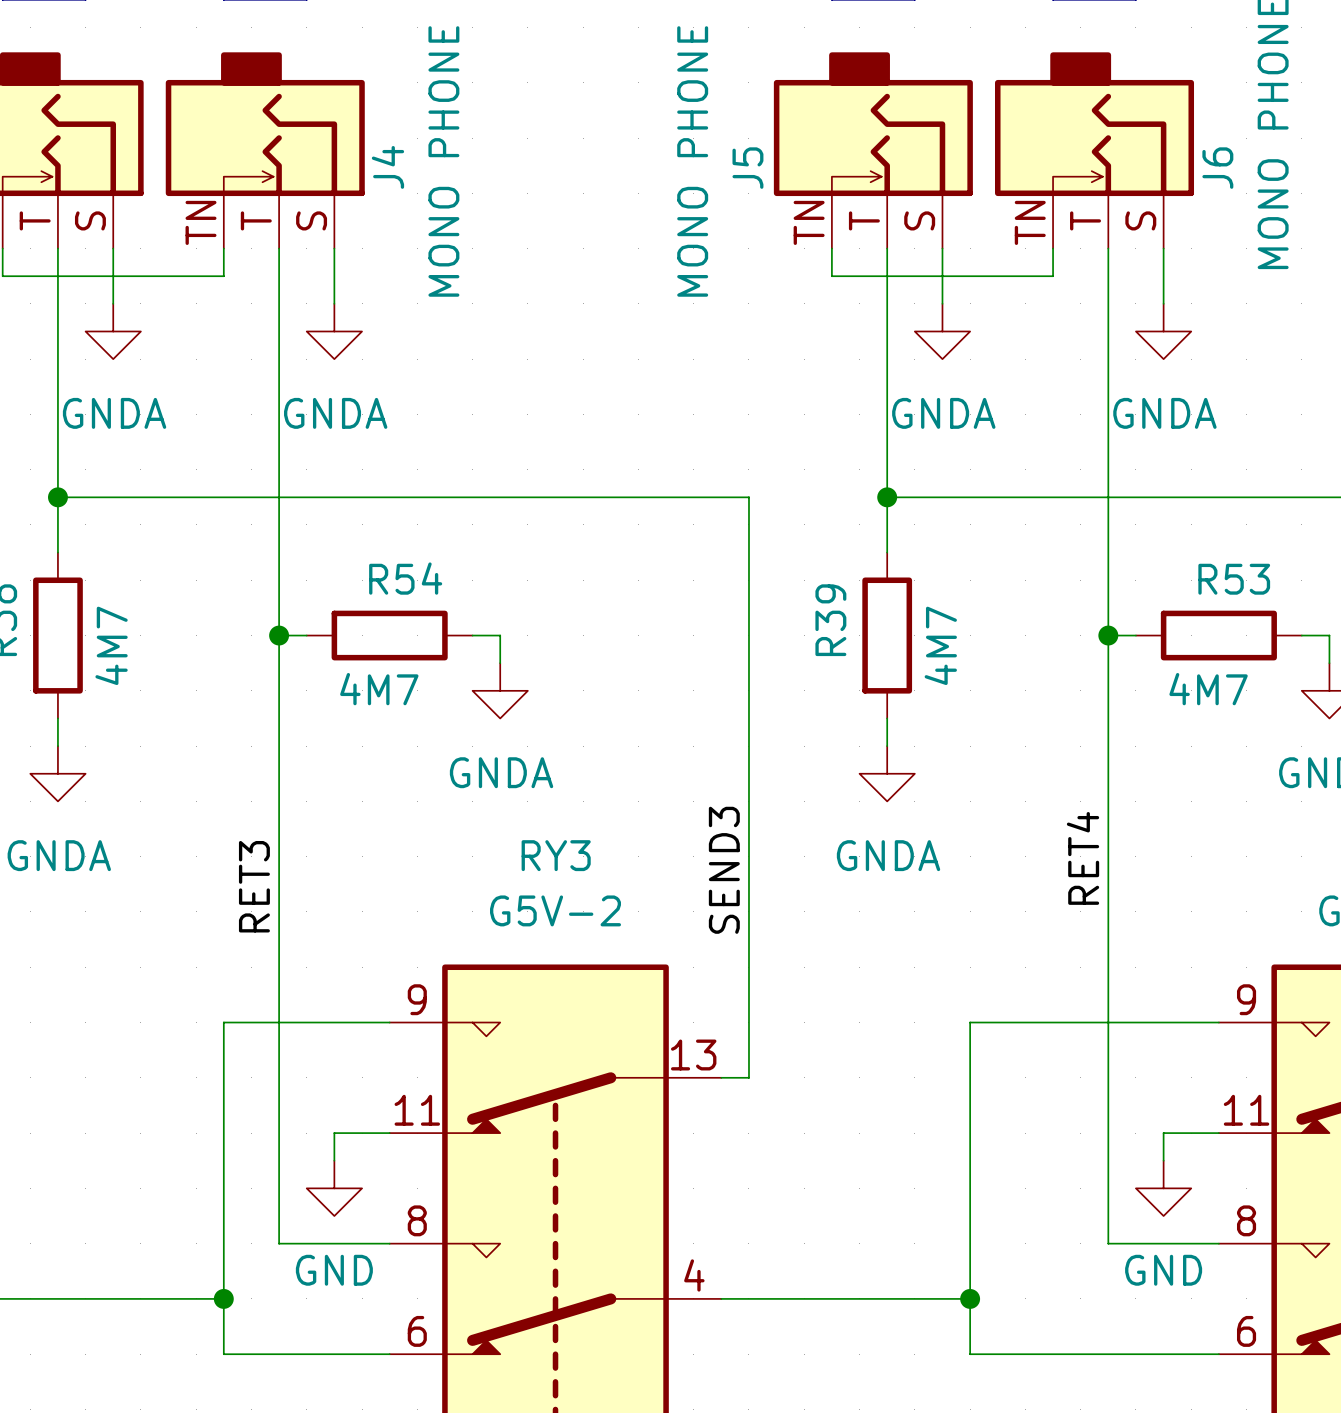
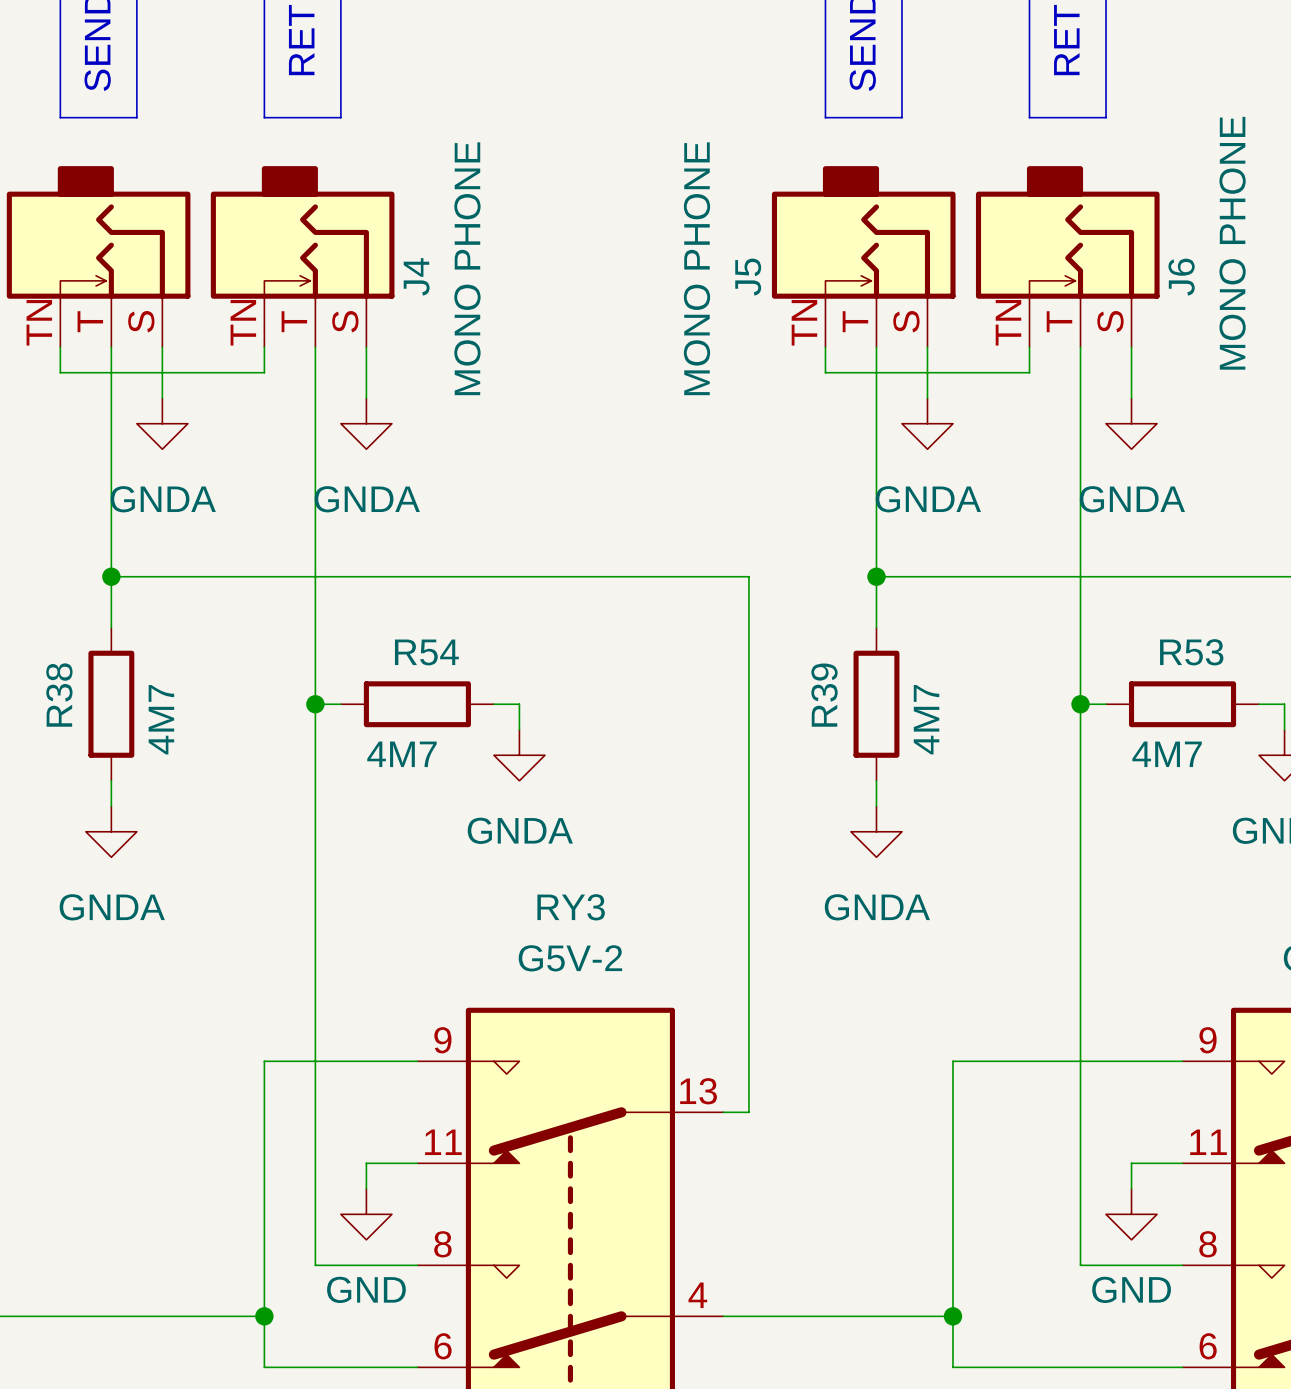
label: RET4 (1083, 858) -> none
label: SEND3 (724, 870) -> none
label: RET3 (254, 886) -> none

